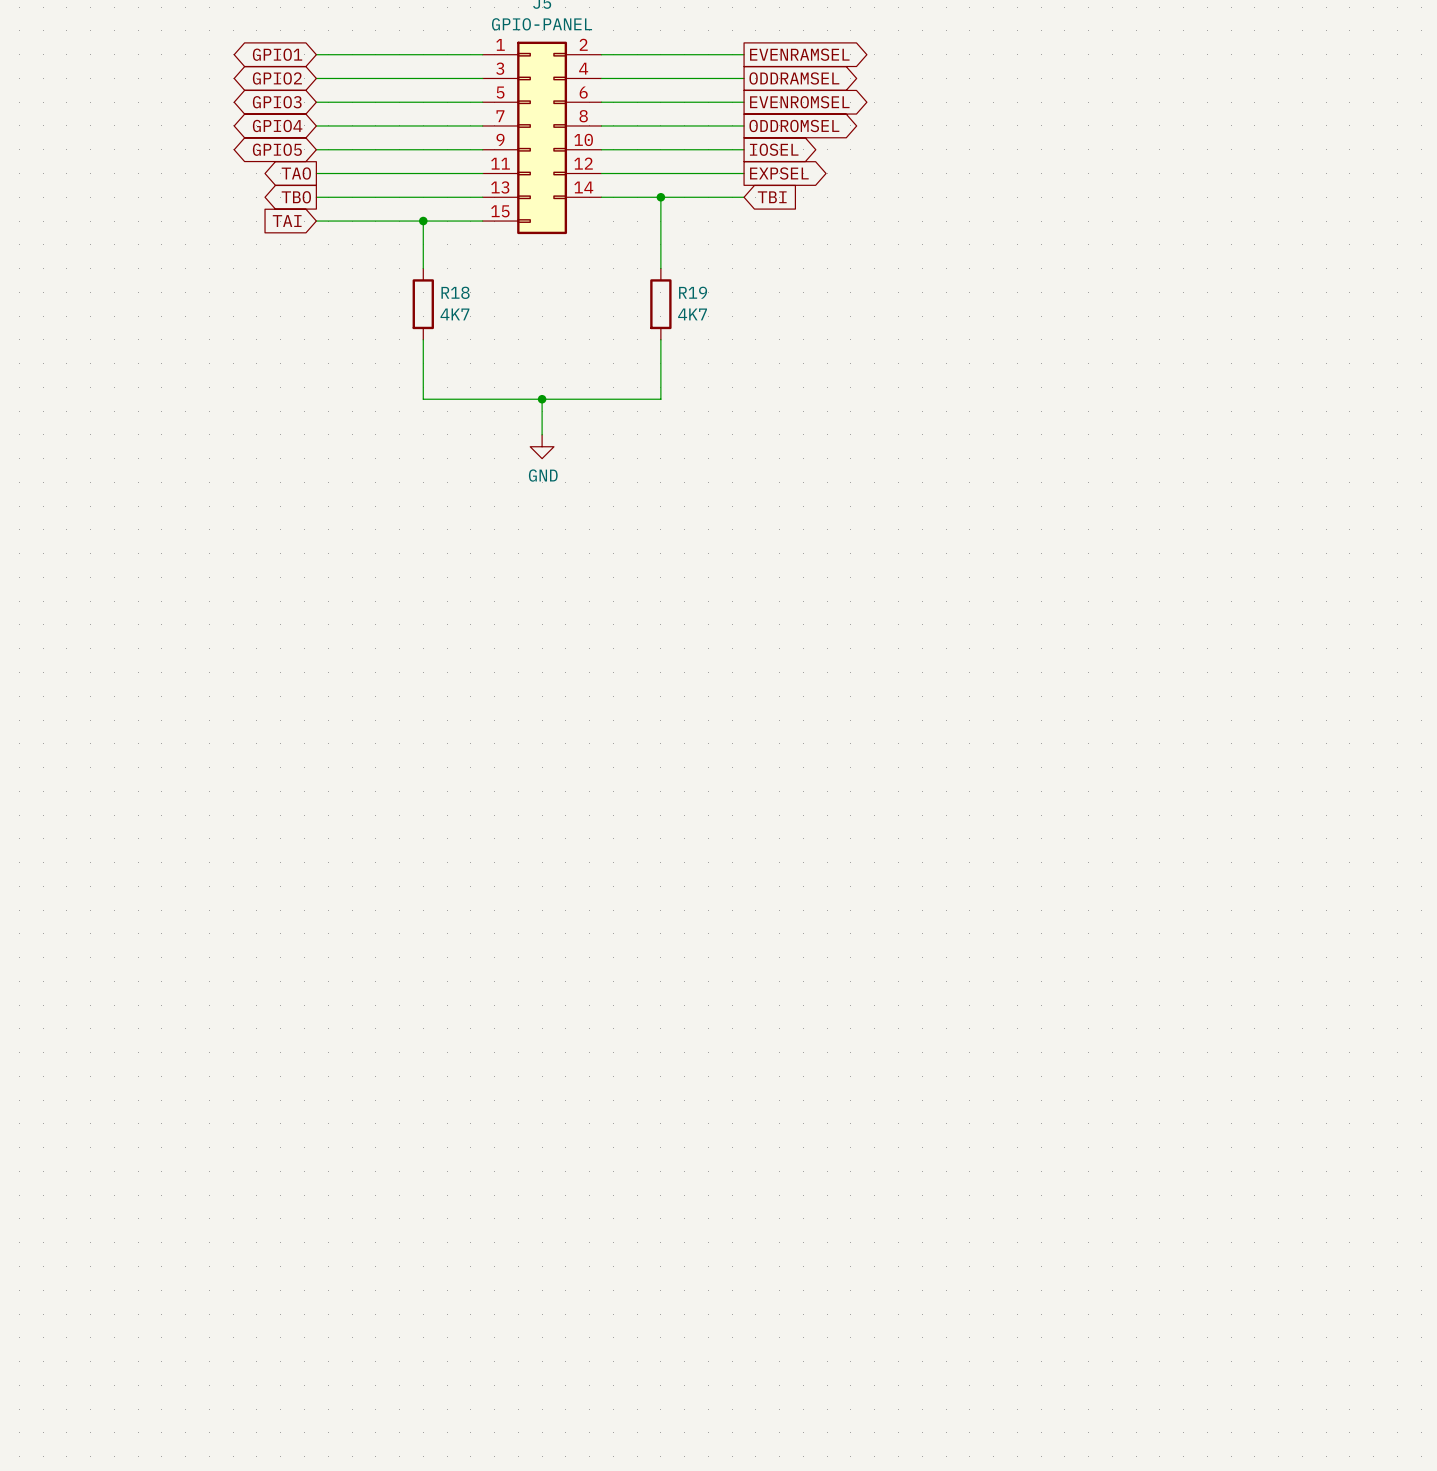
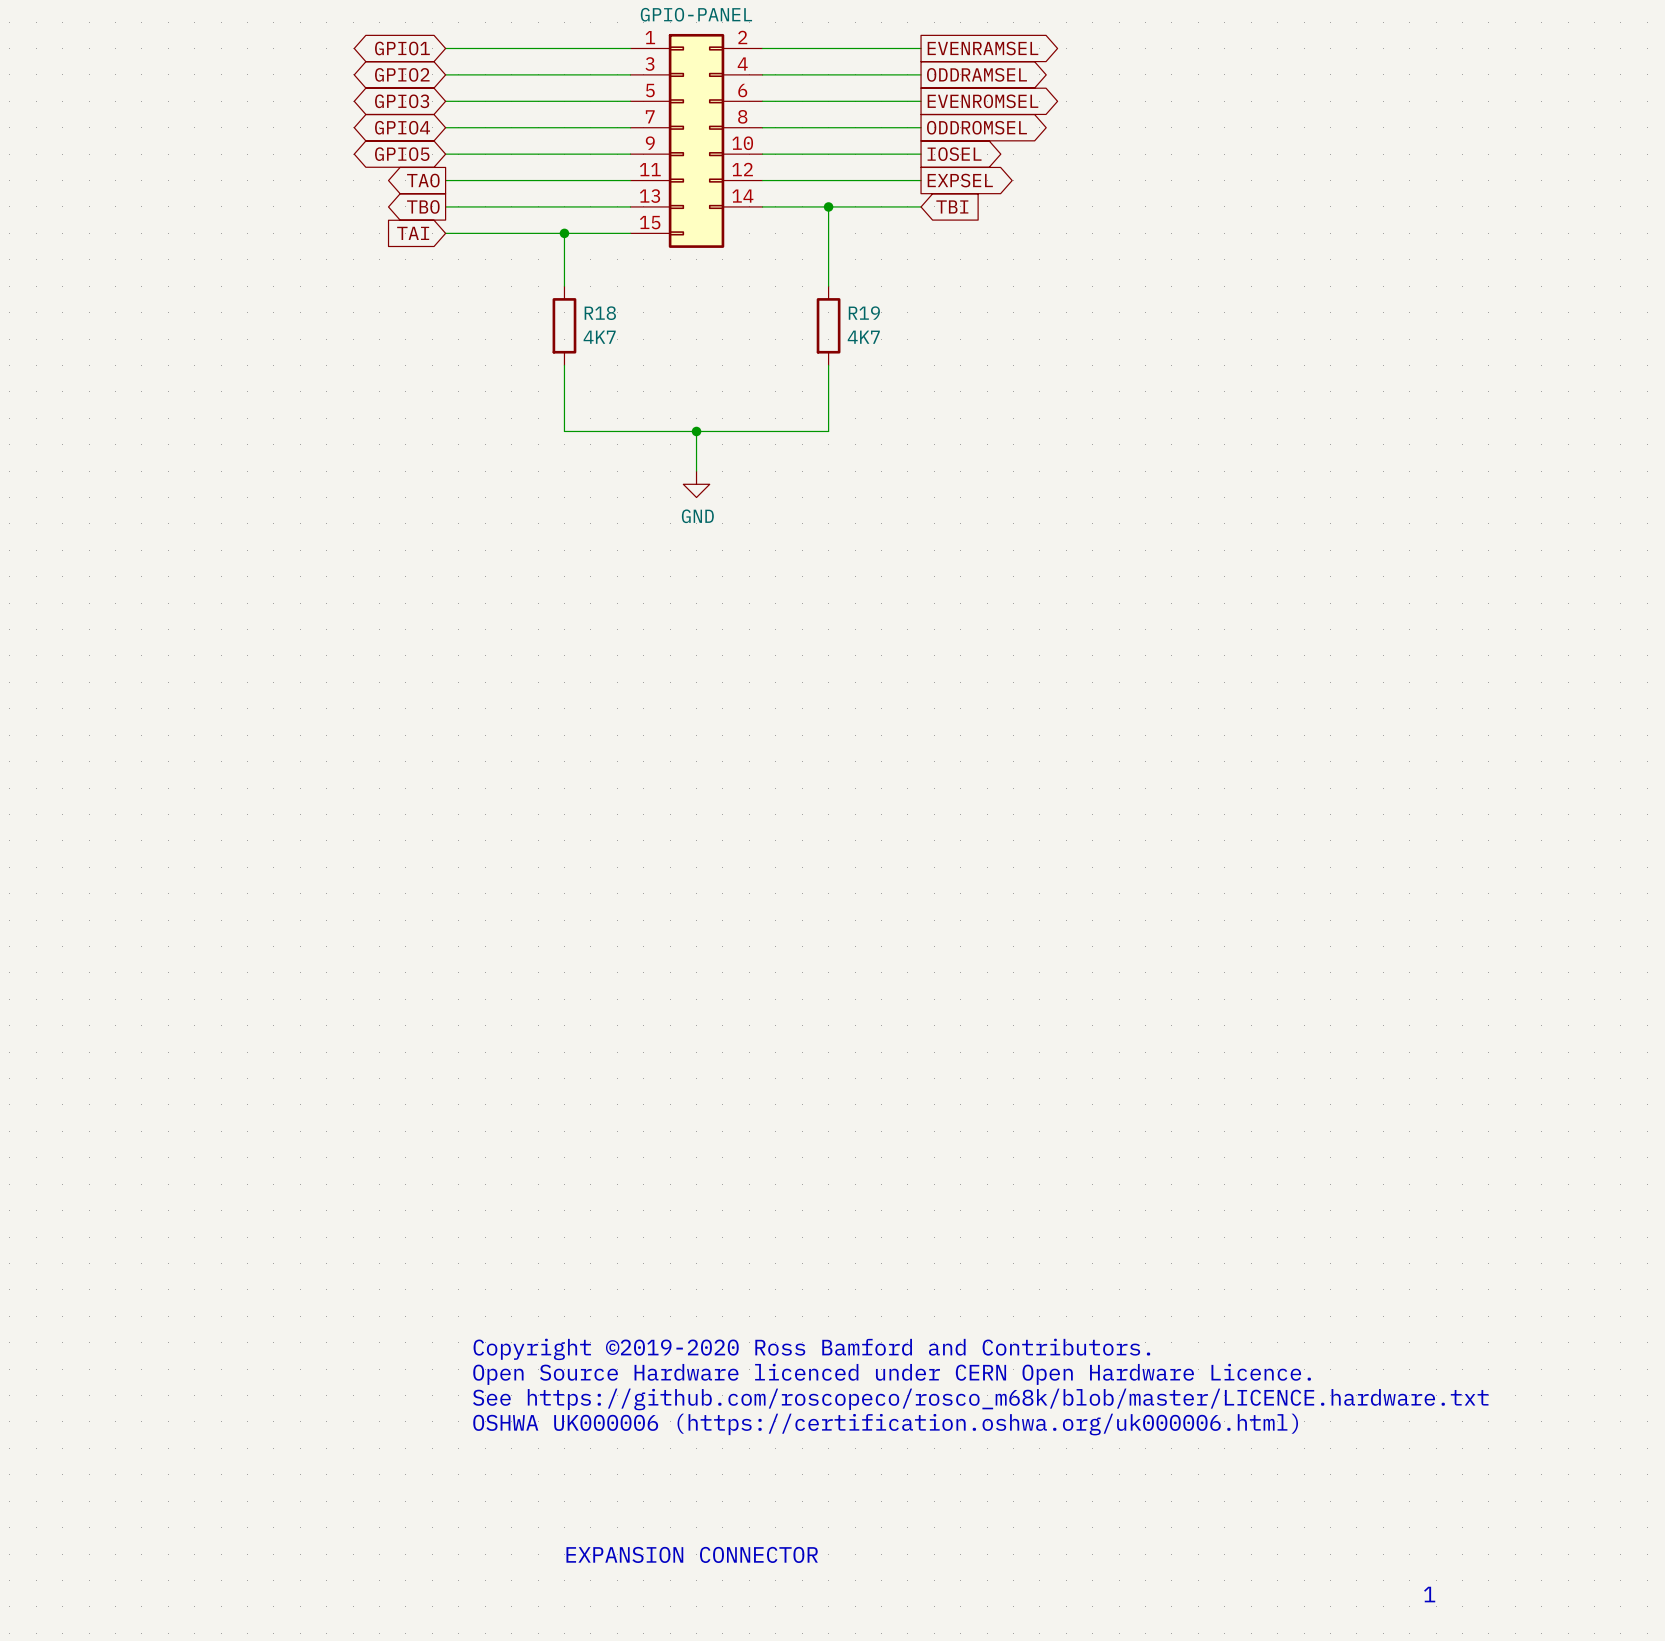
text: none -> Copyright ©2019-2020 Ross Bamford and Contributors. (811, 1349)
text: none -> Open Source Hardware licenced under CERN Open Hardware Licence. (892, 1374)
text: none -> See https://github.com/roscopeco/rosco_m68k/blob/master/LICENCE.hardware.txt (980, 1399)
text: none -> OSHWA UK000006 (https://certification.oshwa.org/uk000006.html) (885, 1424)
text: none -> EXPANSION CONNECTOR (692, 1554)
text: none -> 1 (1429, 1594)

